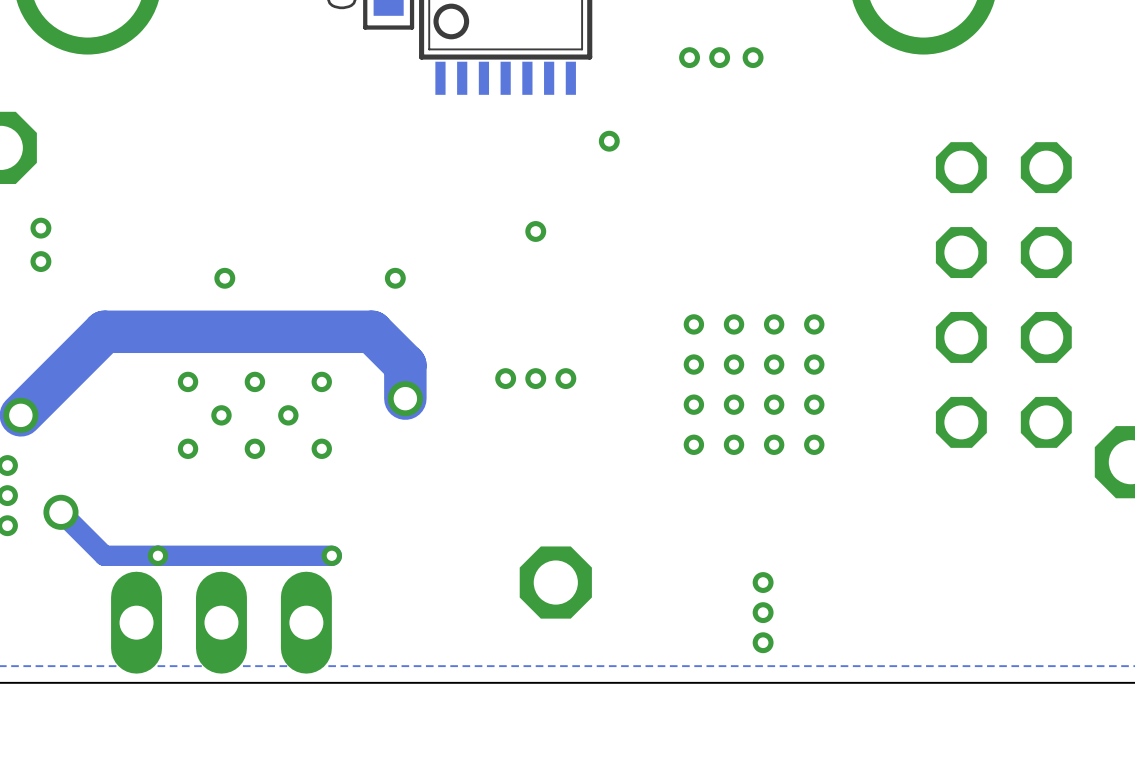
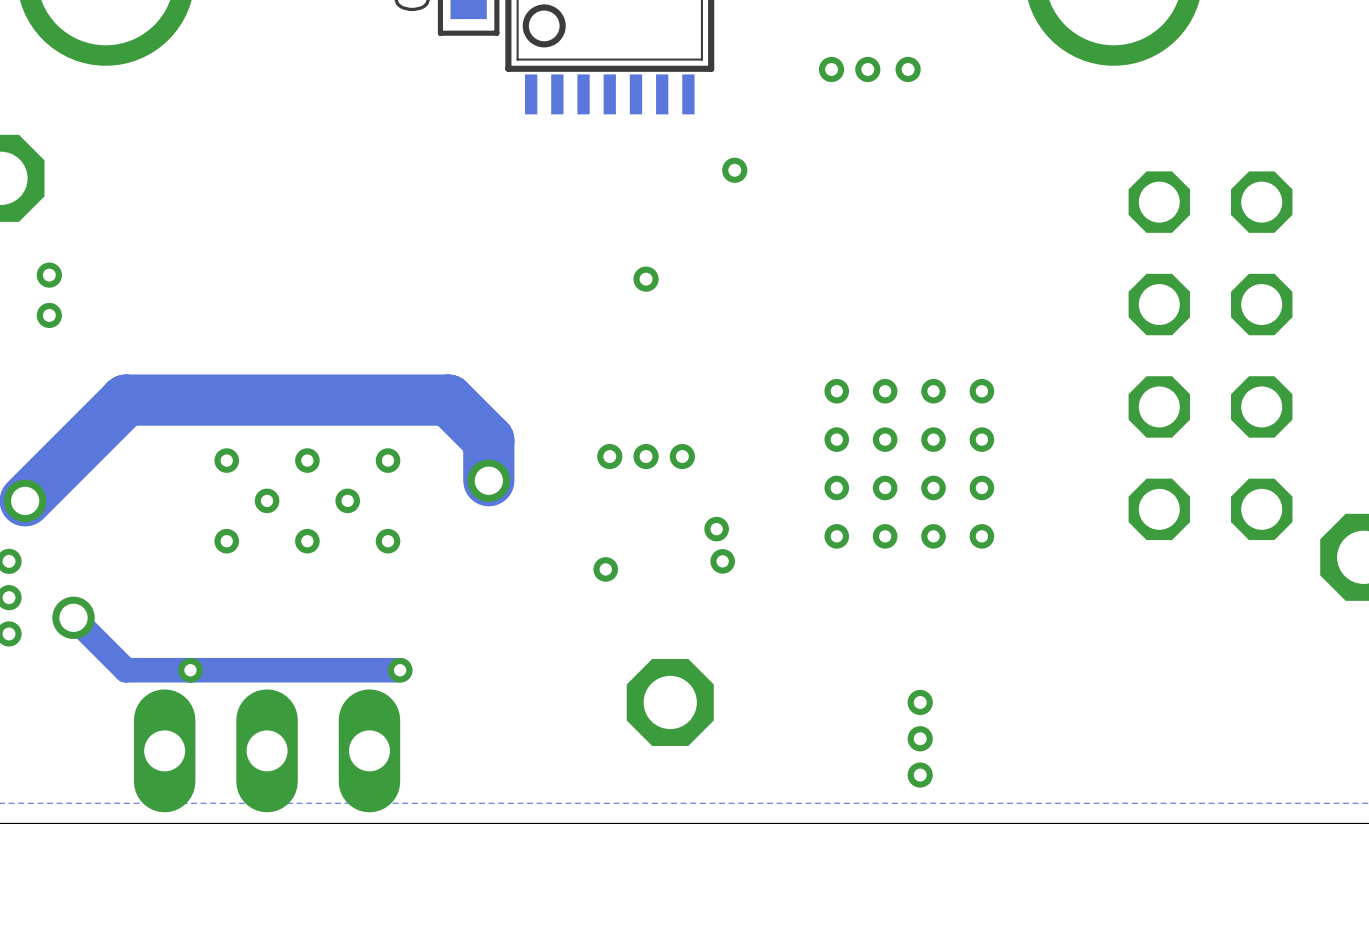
via: (224, 278) -> none
via: (395, 278) -> none
via: none -> (716, 529)
via: none -> (722, 561)
via: none -> (605, 569)

